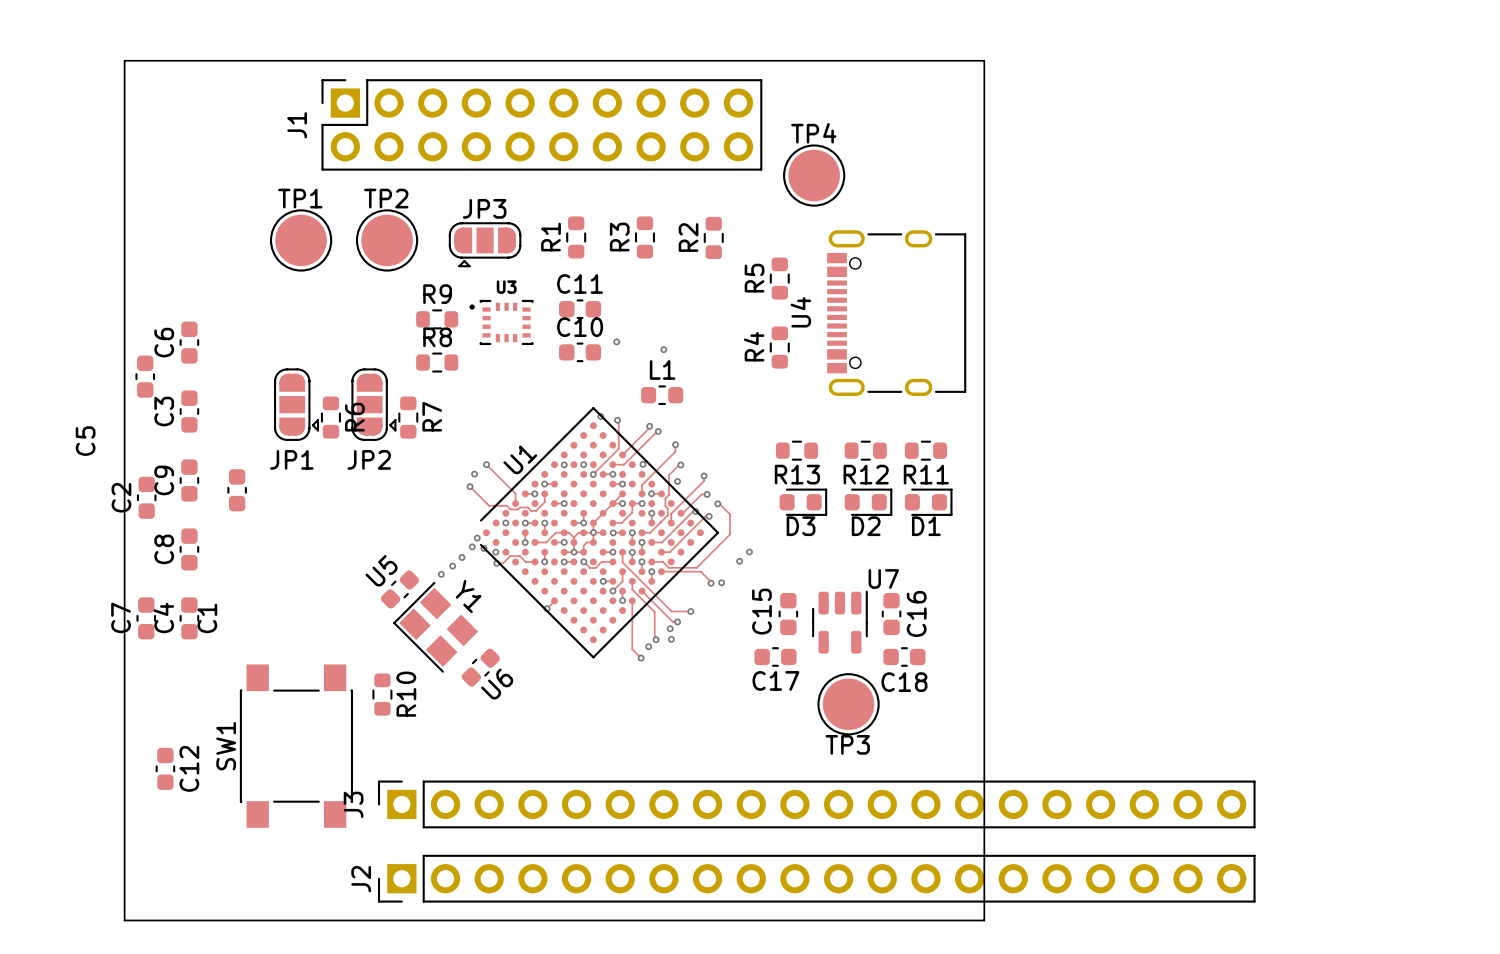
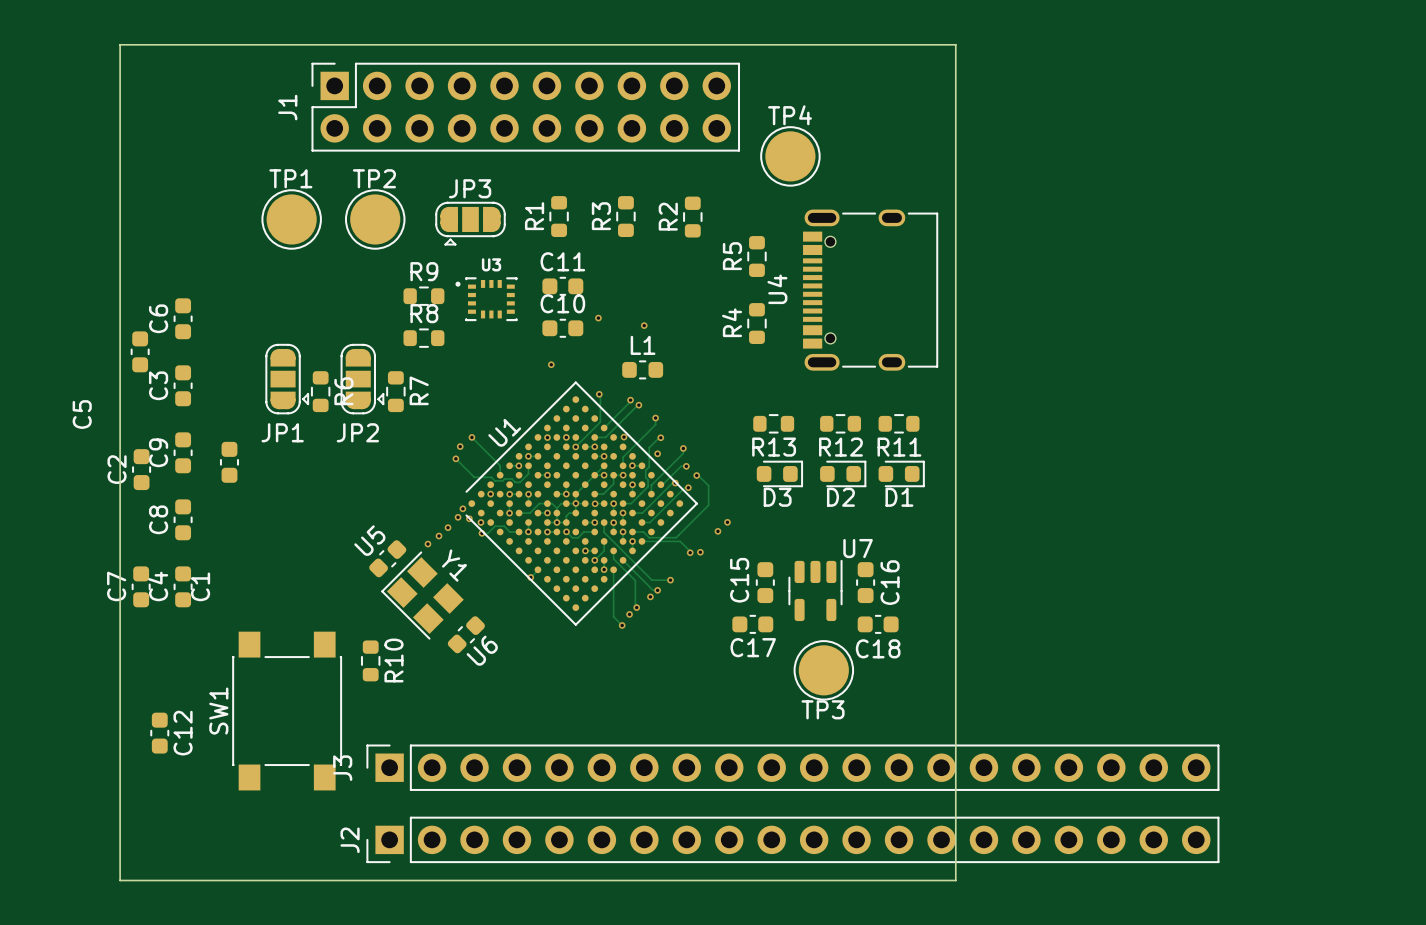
via position: (600, 416) -> (551, 364)
via: (671, 639) -> none

